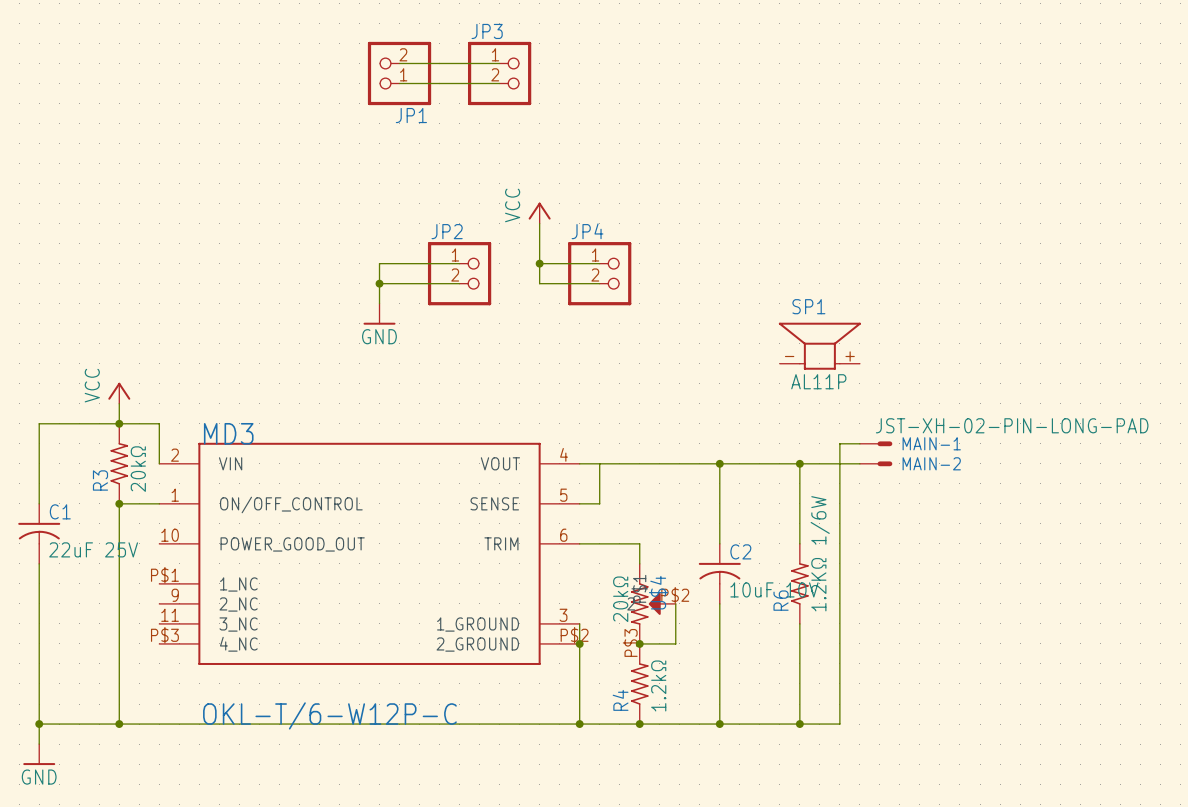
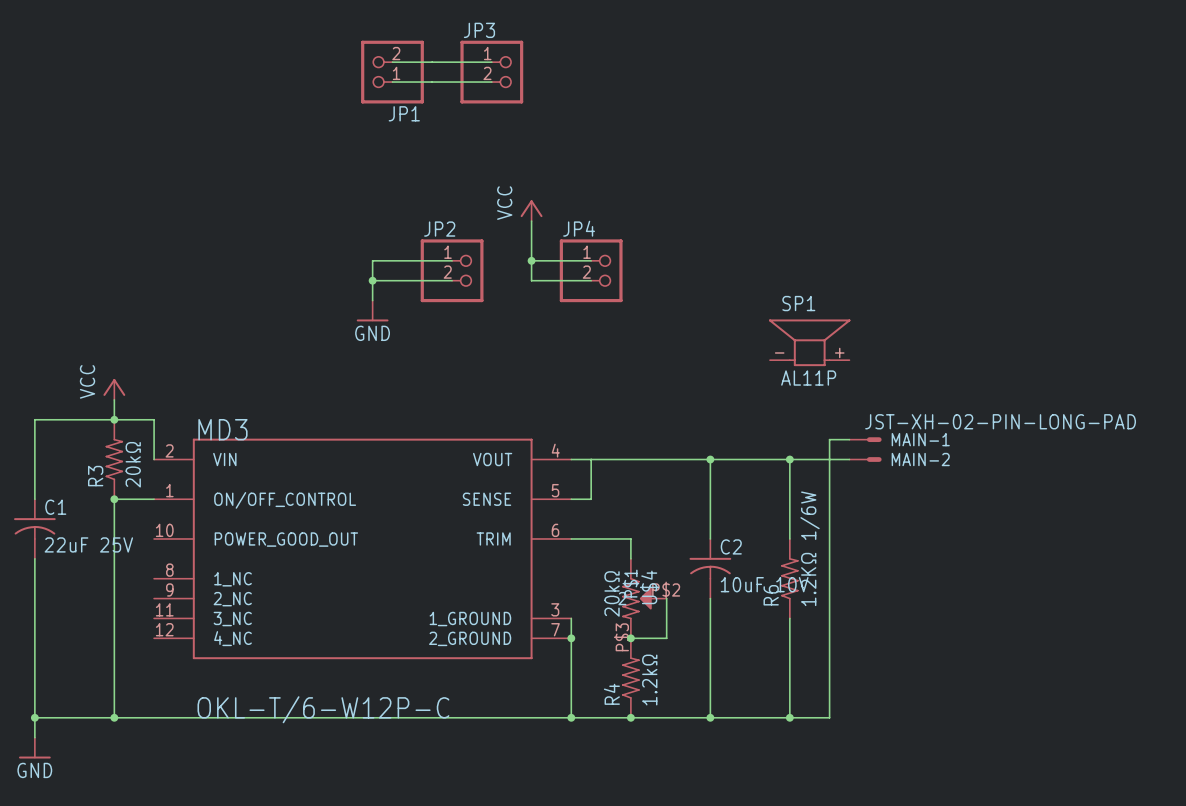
MD3 pin number: P$1 (164, 575) -> 8 (169, 570)
MD3 pin number: P$3 (164, 635) -> 12 (164, 629)
MD3 pin number: P$2 (574, 635) -> 7 (555, 629)

